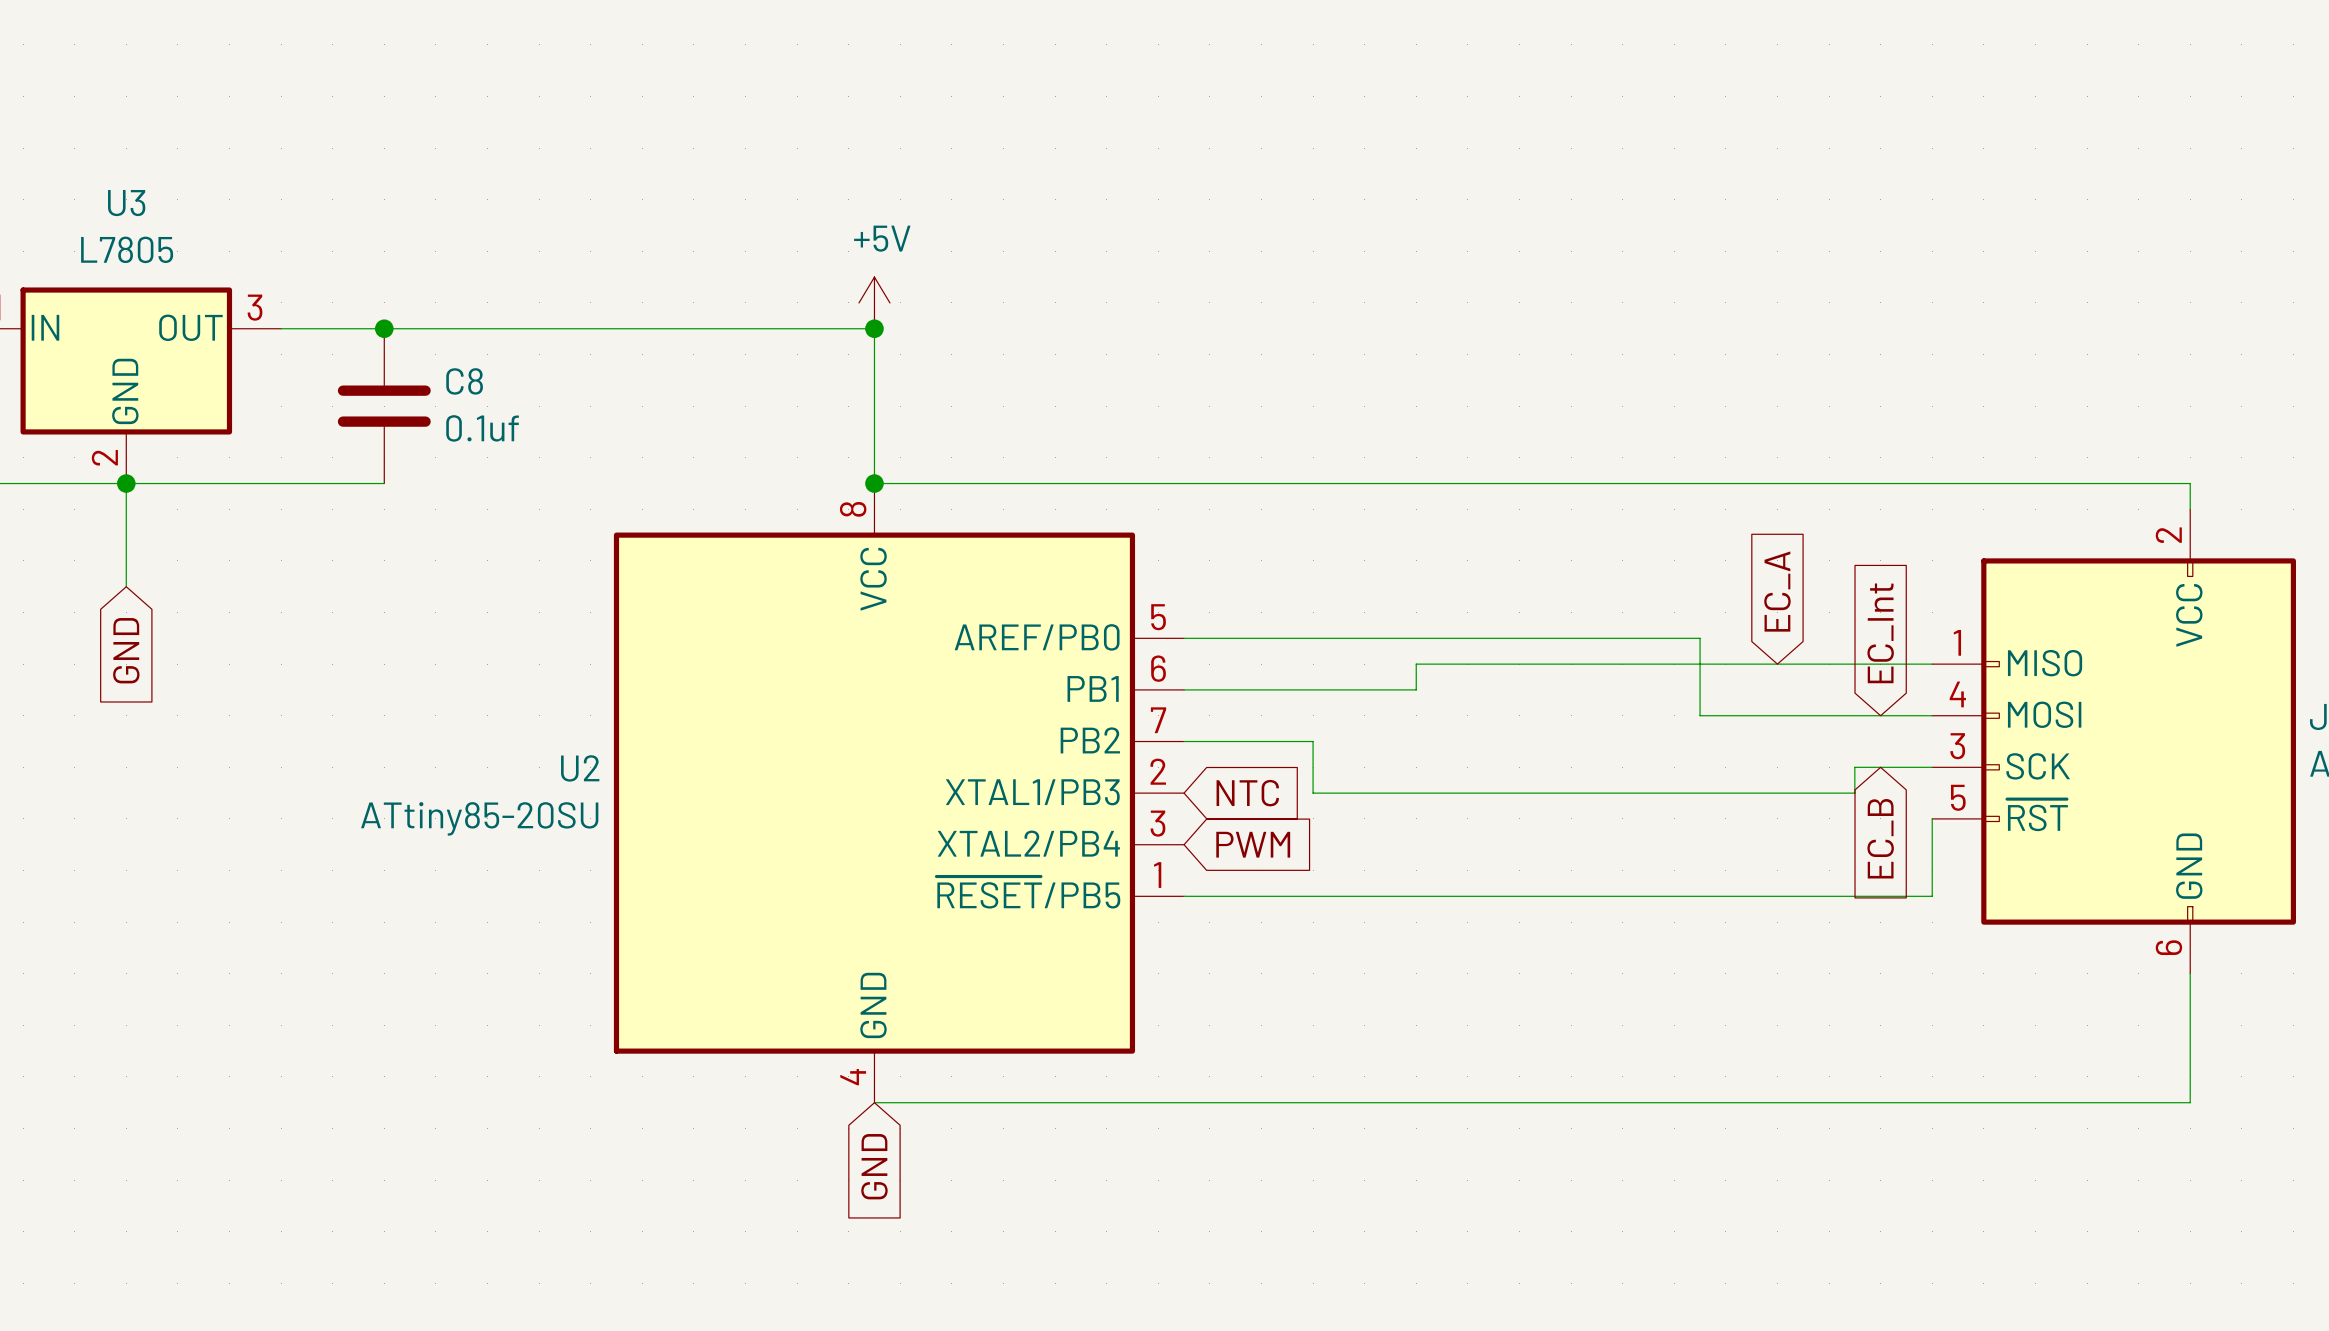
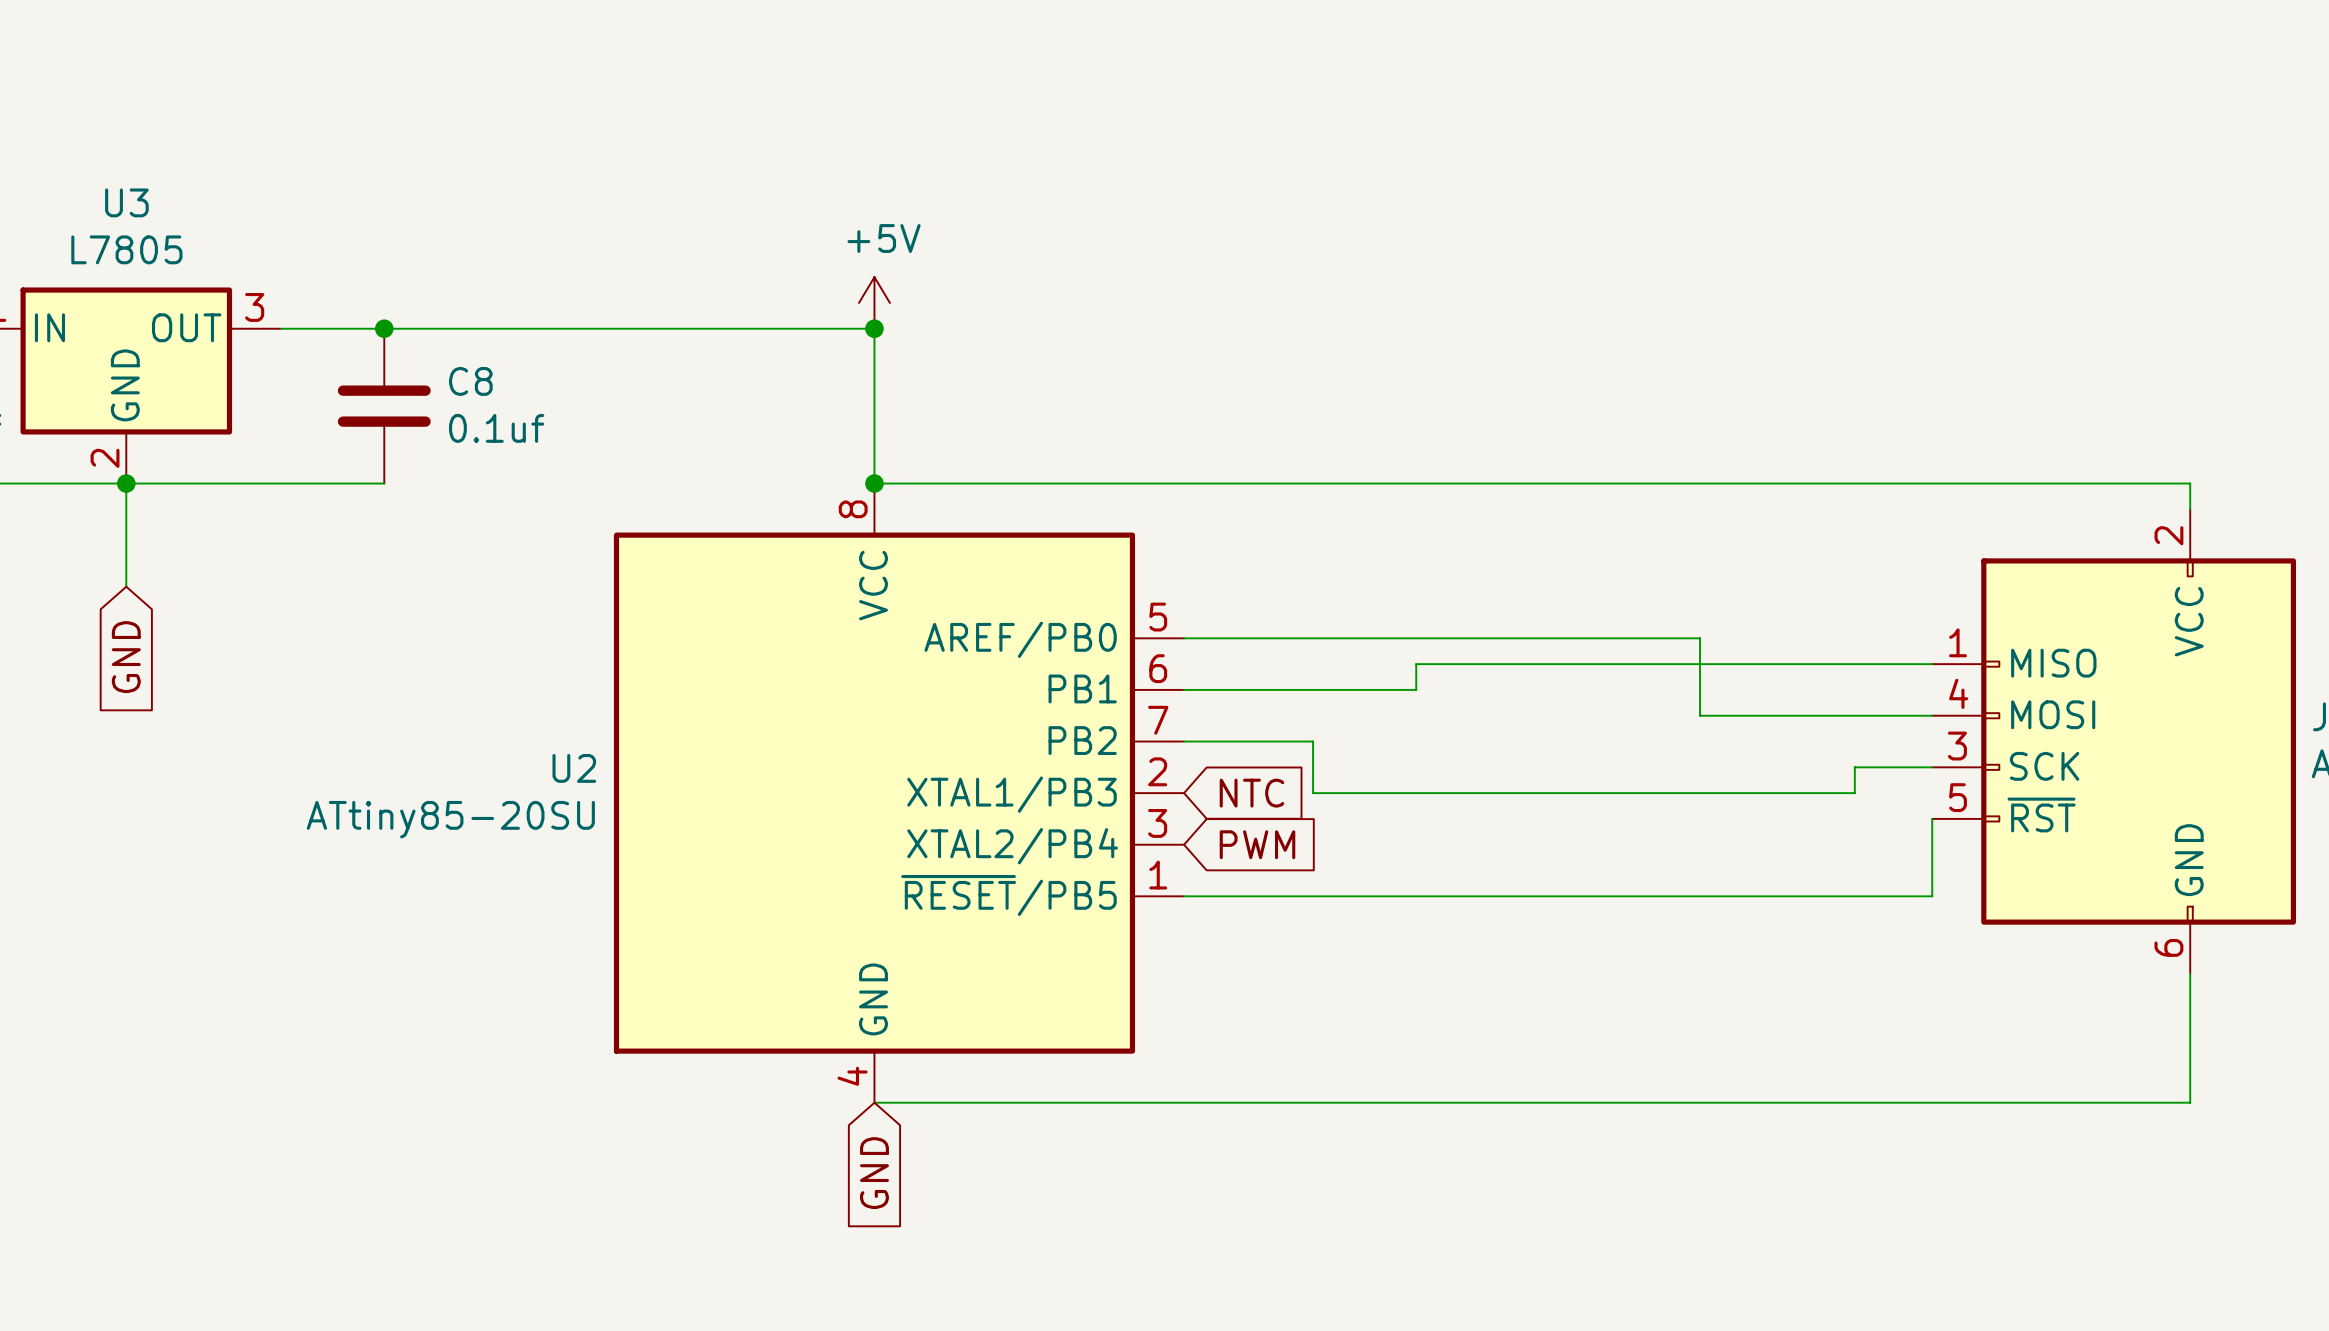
global label: EC_A (1777, 591) -> none
global label: EC_Int (1880, 633) -> none
global label: EC_B (1880, 838) -> none

